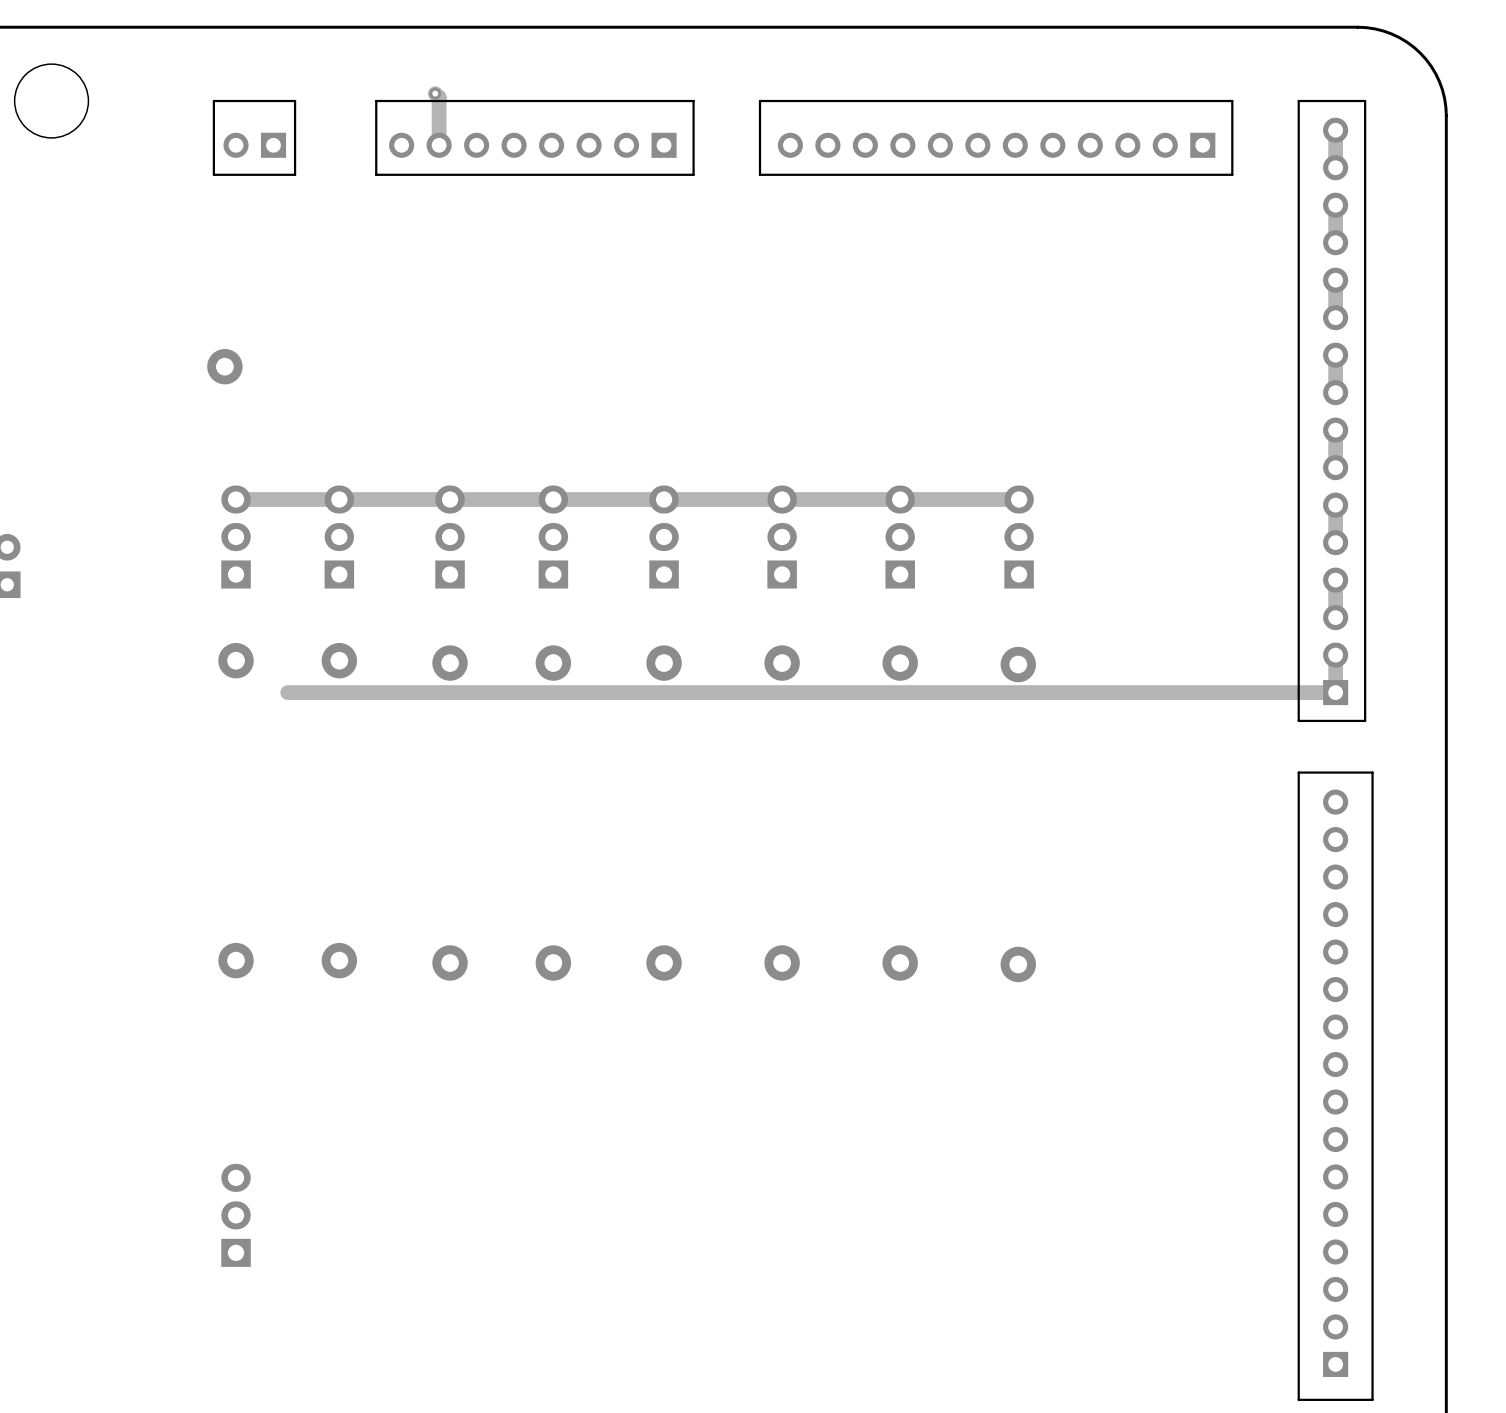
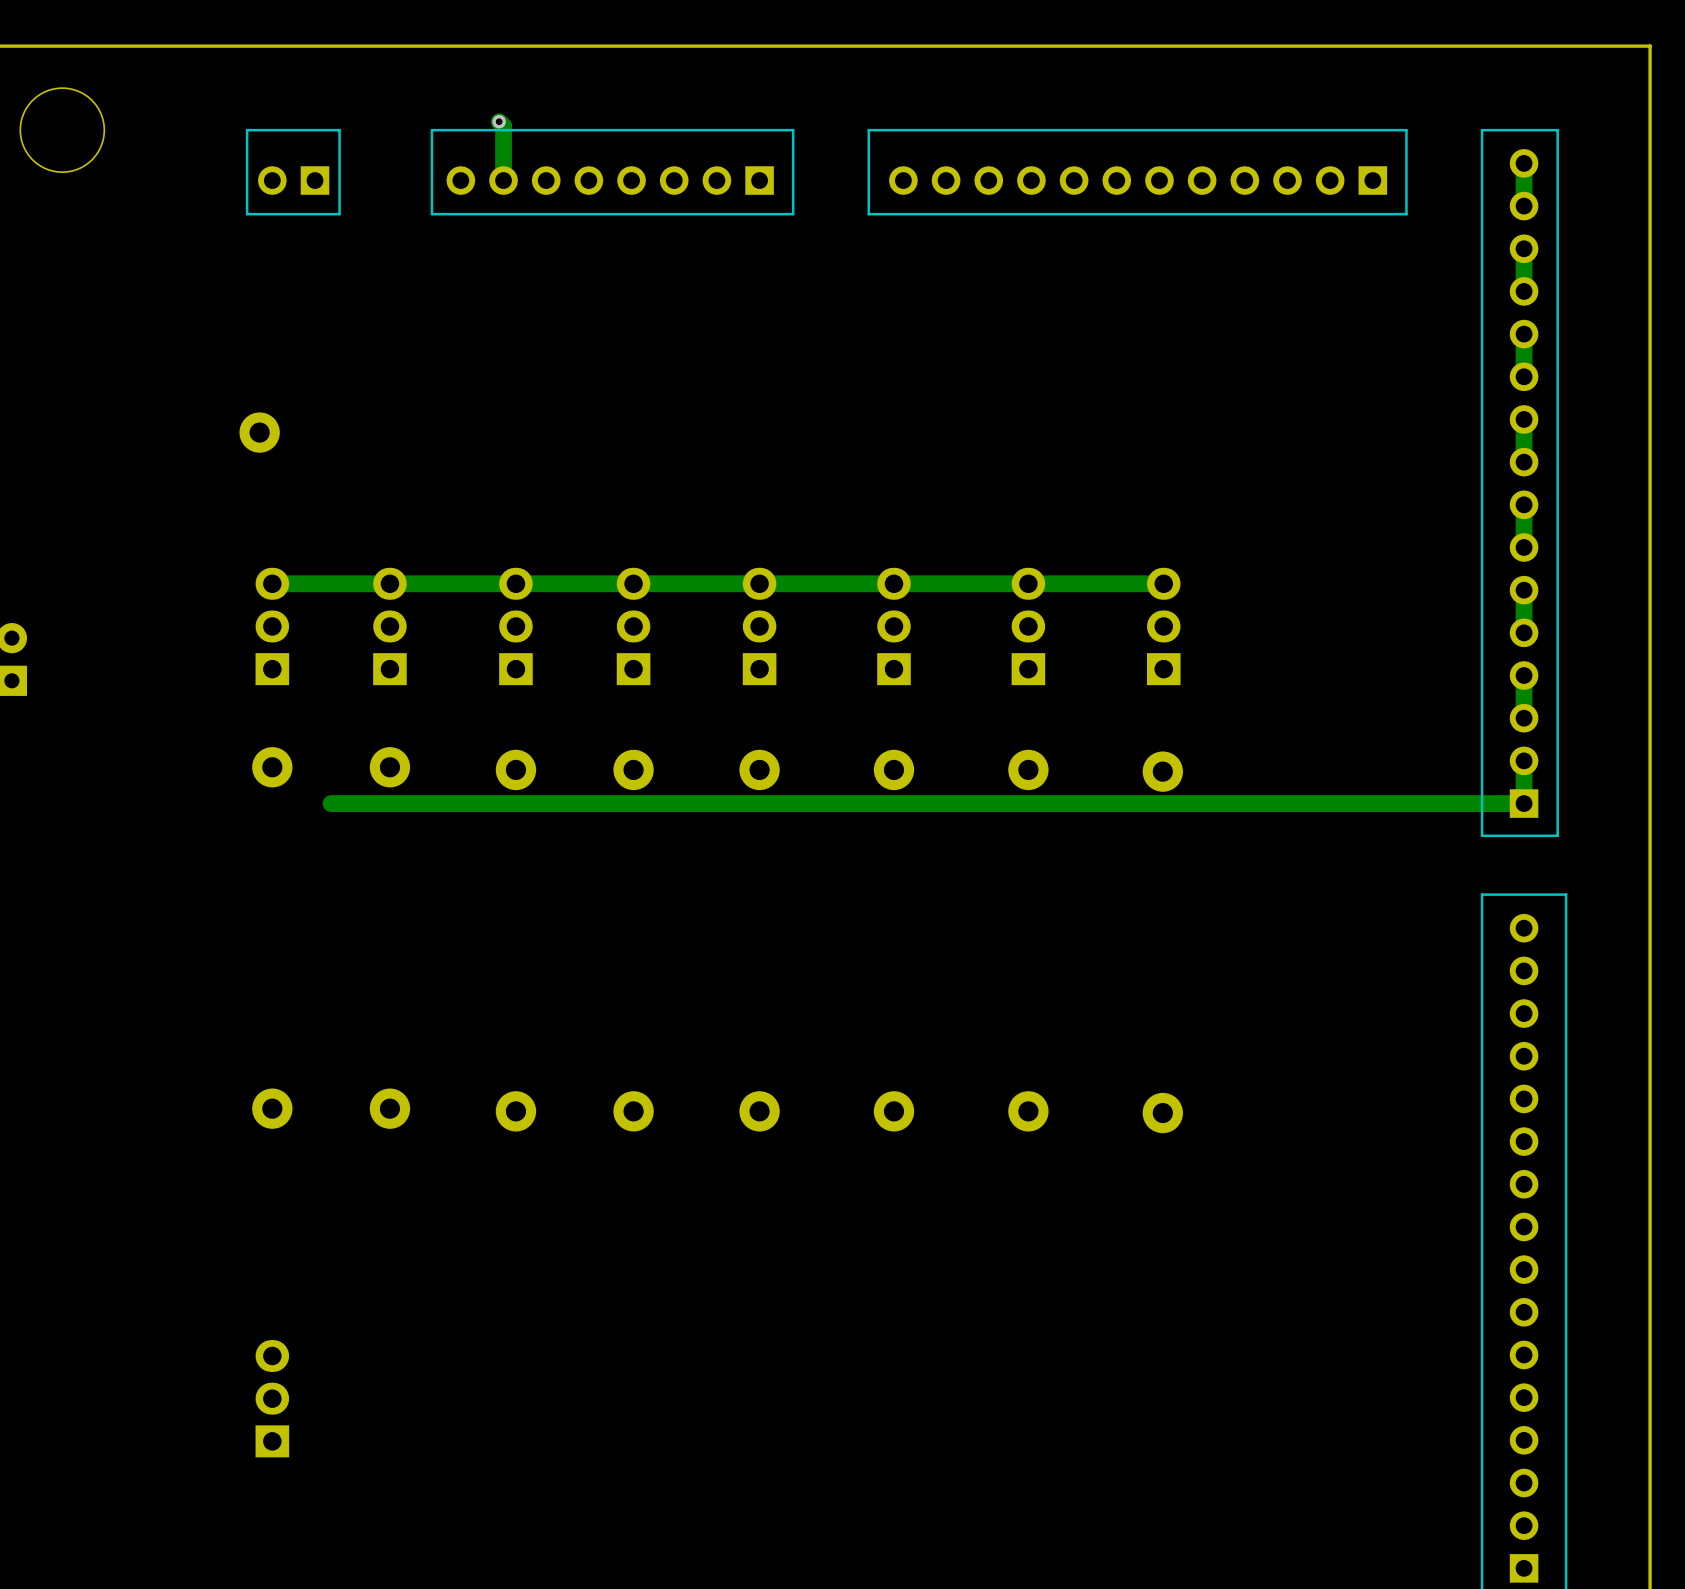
board edge: (1357, 27) (1375, 28) (1391, 33) (1406, 42) (1420, 53) (1431, 66) (1439, 81) (1444, 98) (1446, 115) -> (1549, 46) (1650, 46) (1650, 146)

